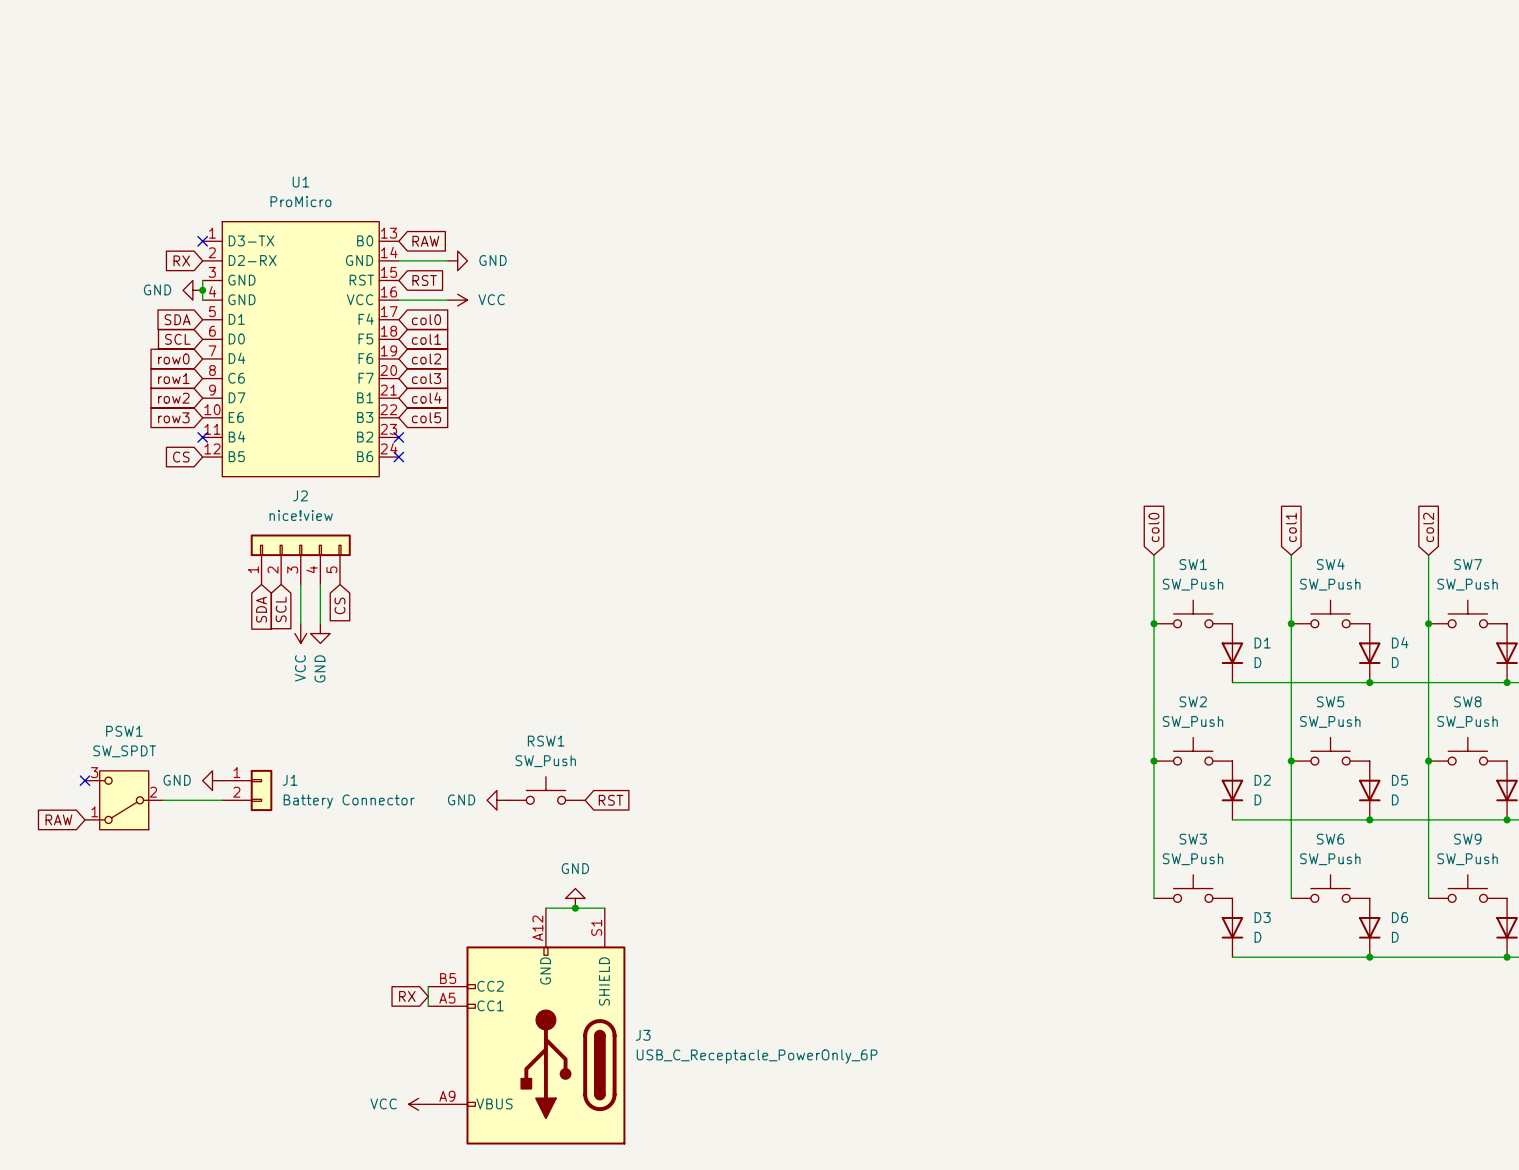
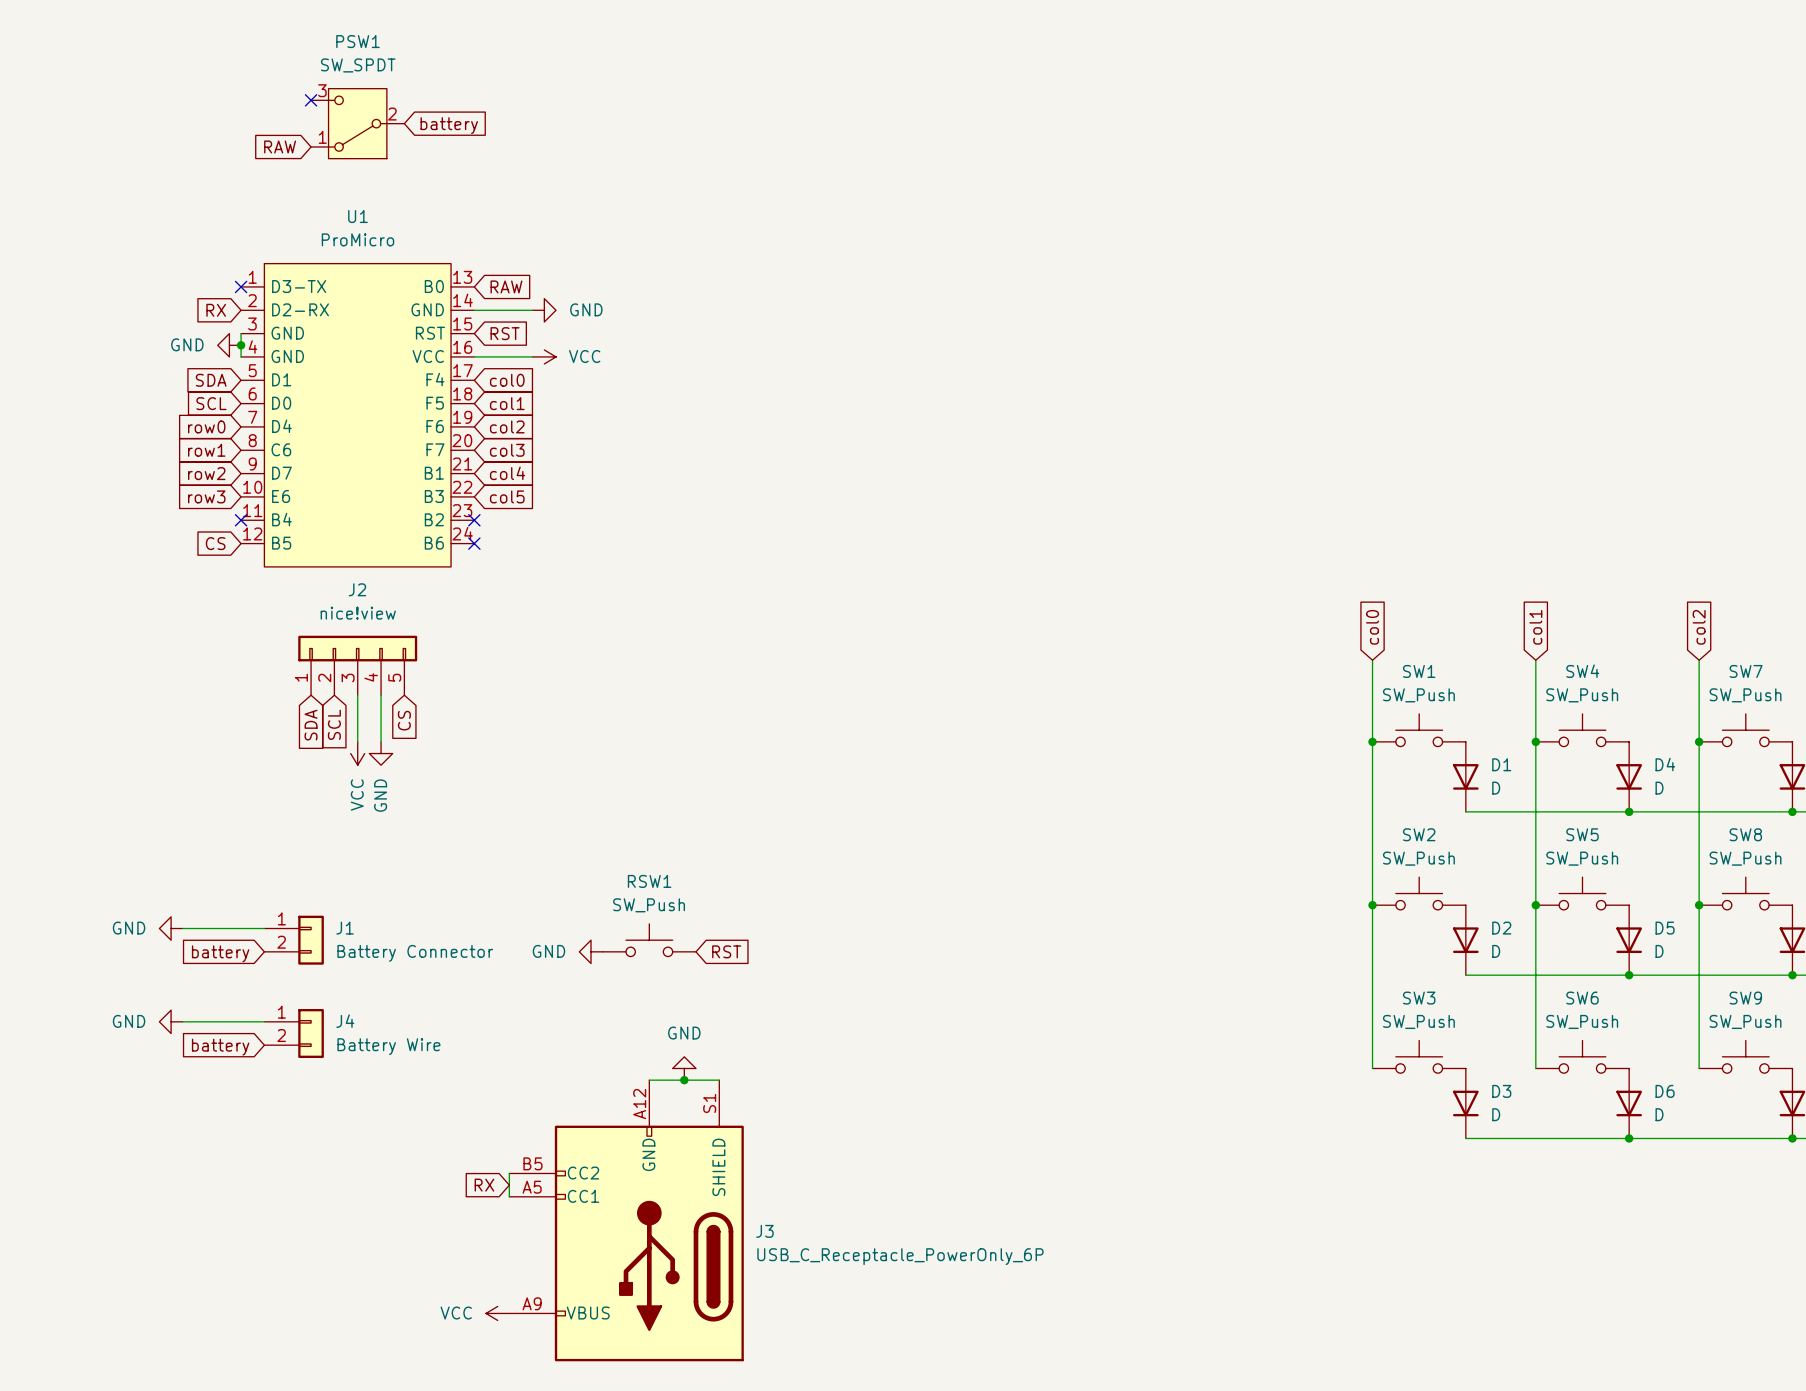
no-connect mark: none -> (311, 100)
global label: none -> battery (449, 125)
global label: none -> RAW (280, 146)
no-connect mark: (84, 780) -> none
power symbol: none -> GND (171, 928)
wire: none -> (182, 928) (264, 928)
power symbol: GND (212, 780) -> none
PSW1 position: (124, 800) -> (357, 123)
wire: (163, 800) (222, 800) -> none
global label: none -> battery (220, 953)
global label: RAW (58, 819) -> none
power symbol: none -> GND (171, 1021)
wire: none -> (182, 1021) (264, 1021)
J4: none -> Battery Wire (294, 1033)
global label: none -> battery (220, 1047)

